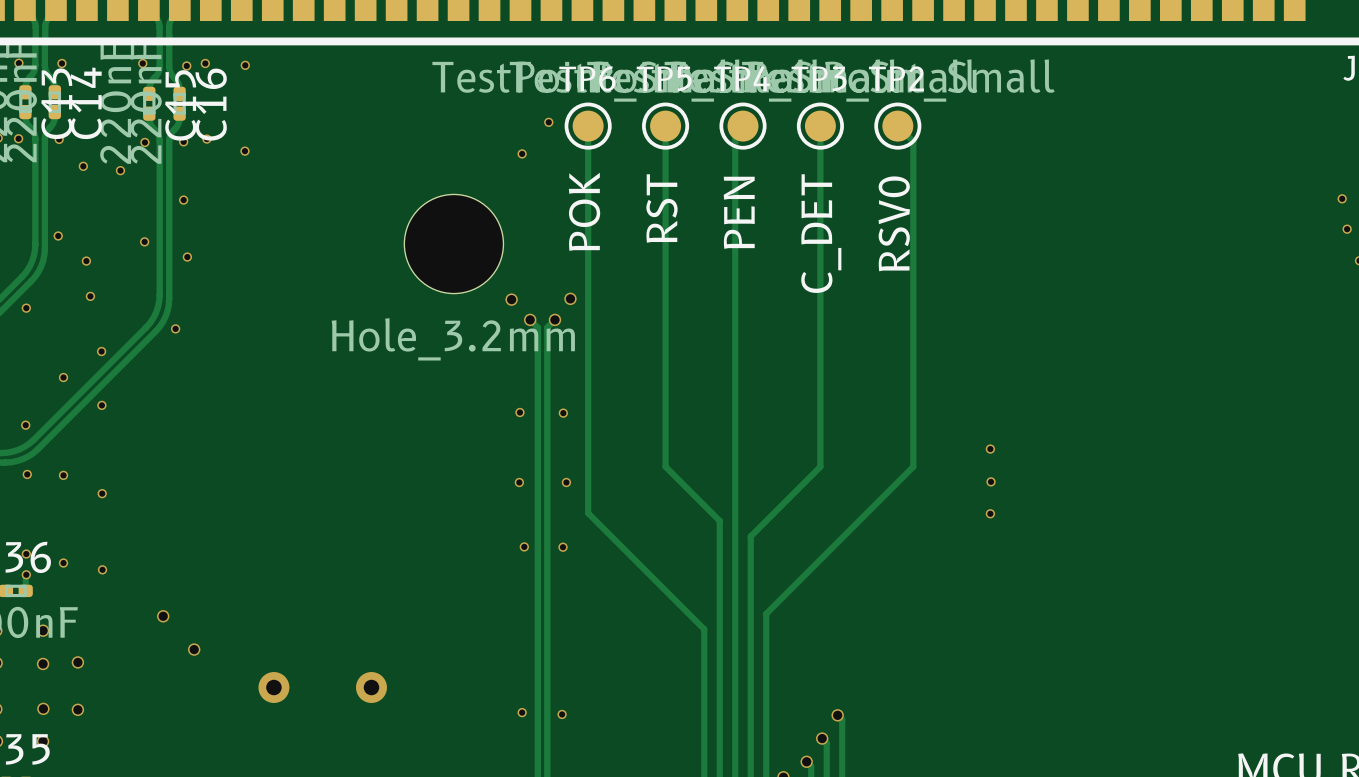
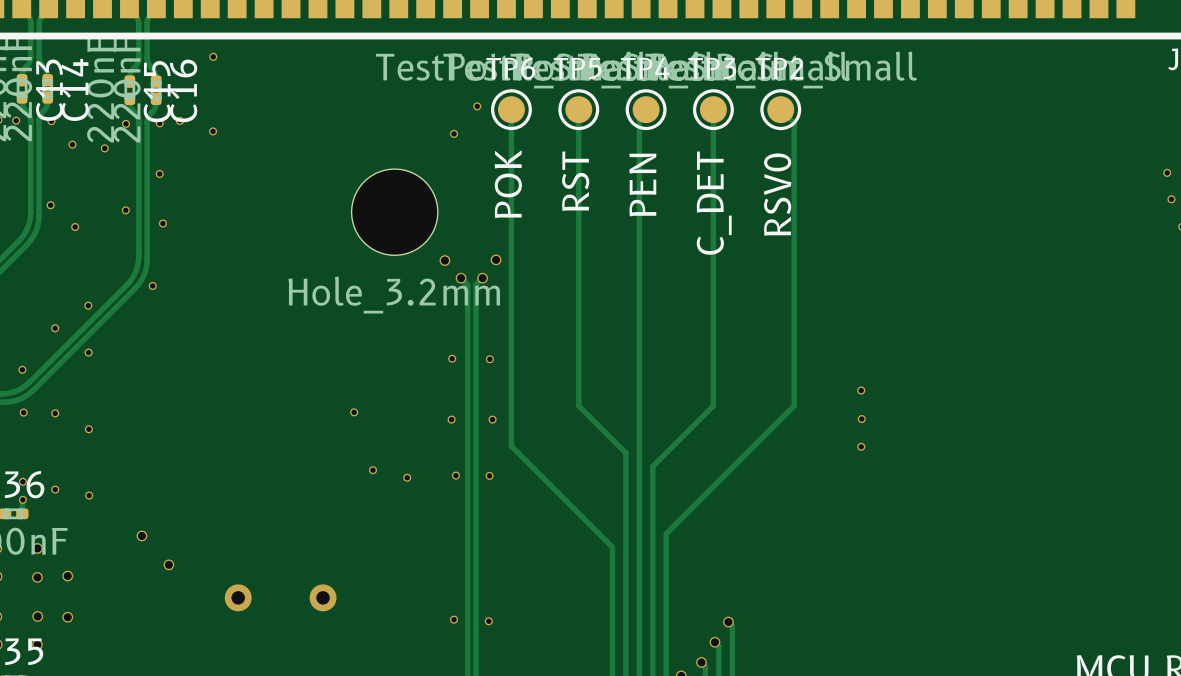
via: (18, 63) -> none
via: (61, 63) -> none
via: (142, 63) -> none
via: (205, 63) -> none
via: (186, 65) -> none
via: (90, 296) -> none
via: (26, 308) -> none
via: none -> (354, 412)
via: none -> (373, 470)
via: none -> (407, 477)

